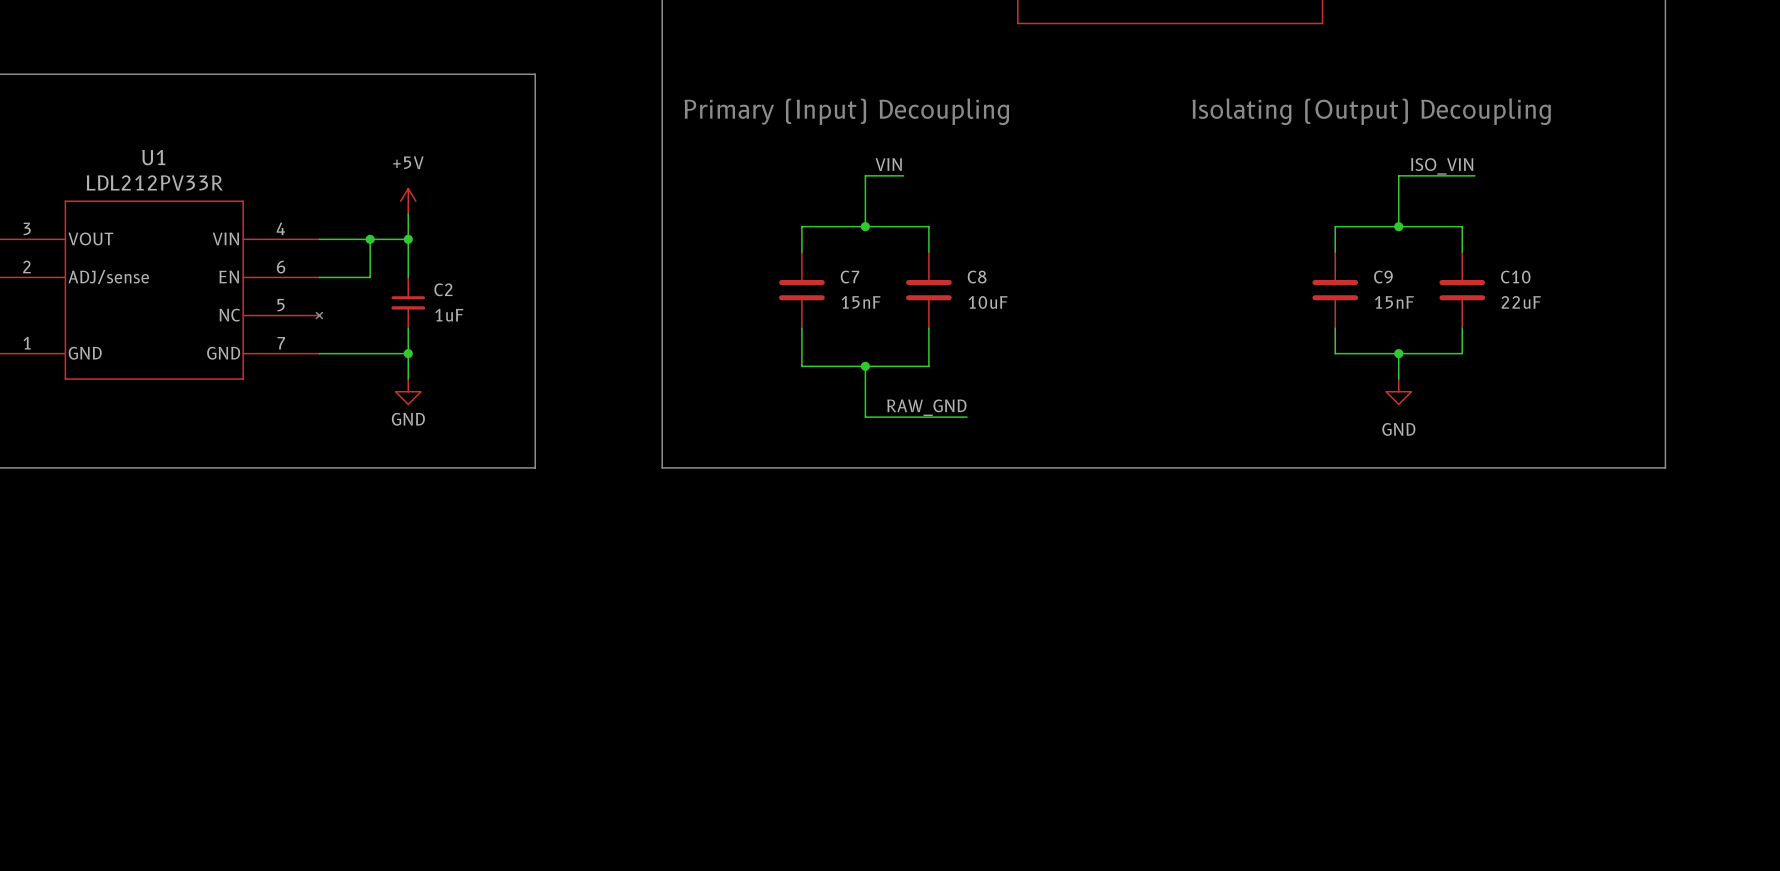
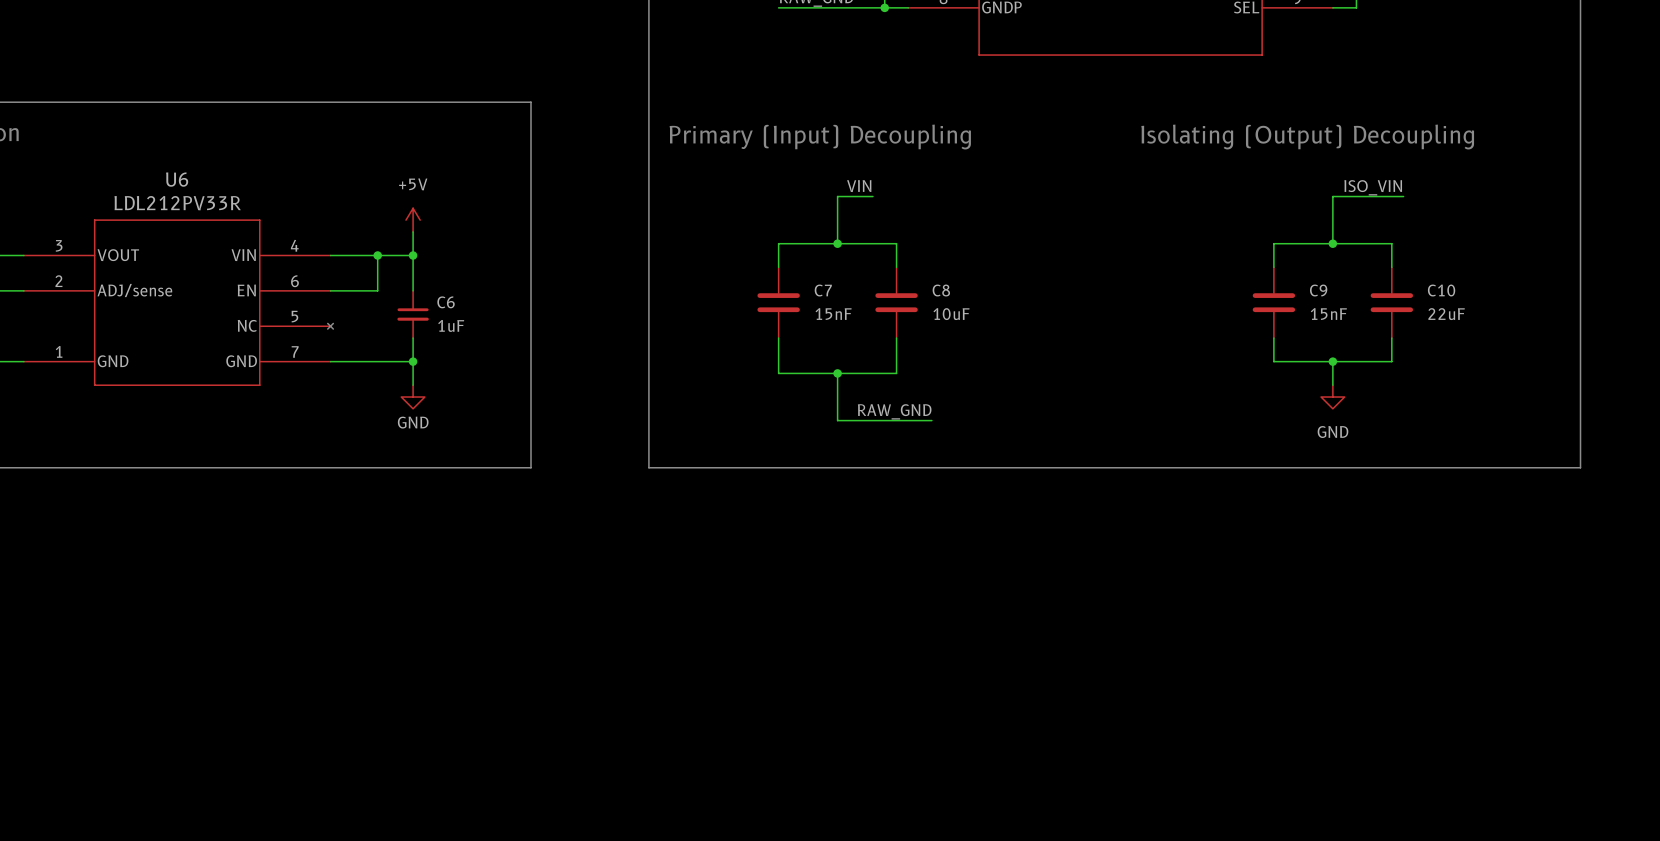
U1 name: U1 (153, 157) -> U6 (177, 179)
C2 name: C2 (443, 289) -> C6 (446, 302)

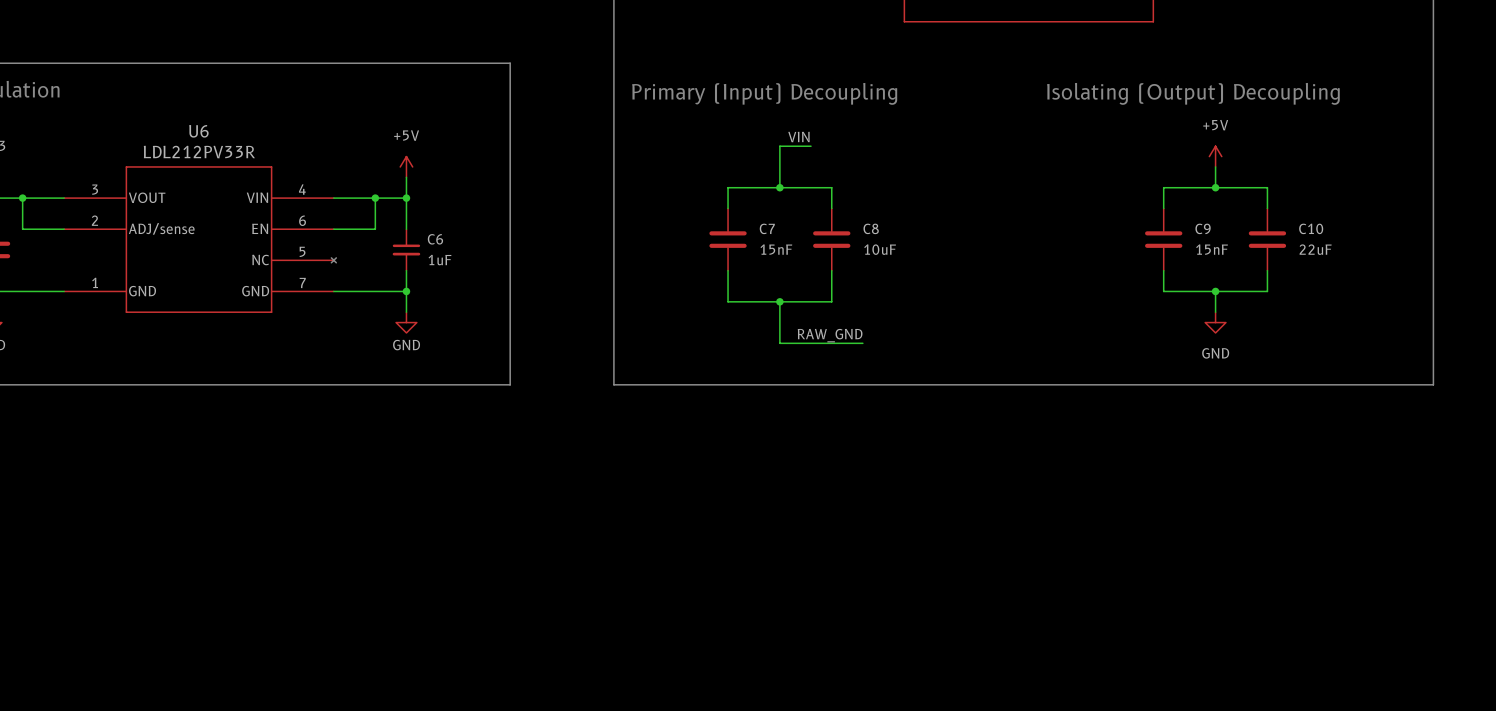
label: ISO_VIN (1373, 187) -> none
wire: (1403, 196) (1332, 196) (1332, 220) -> none
power symbol: none -> +5V (1215, 156)

